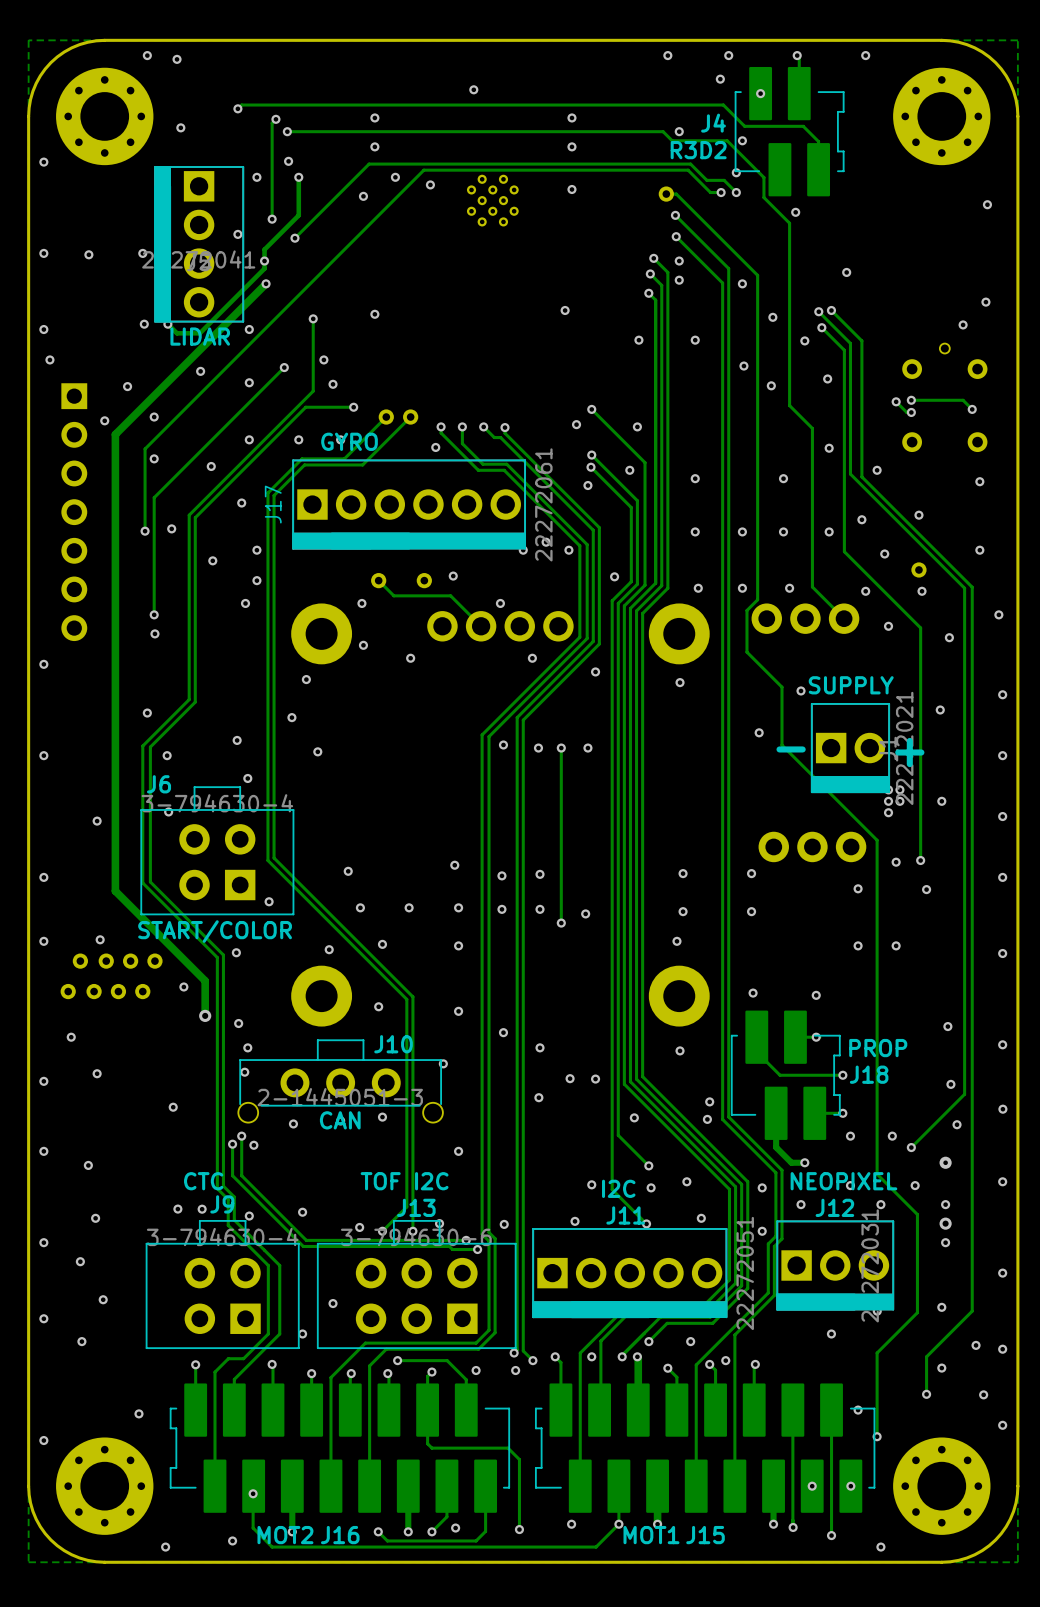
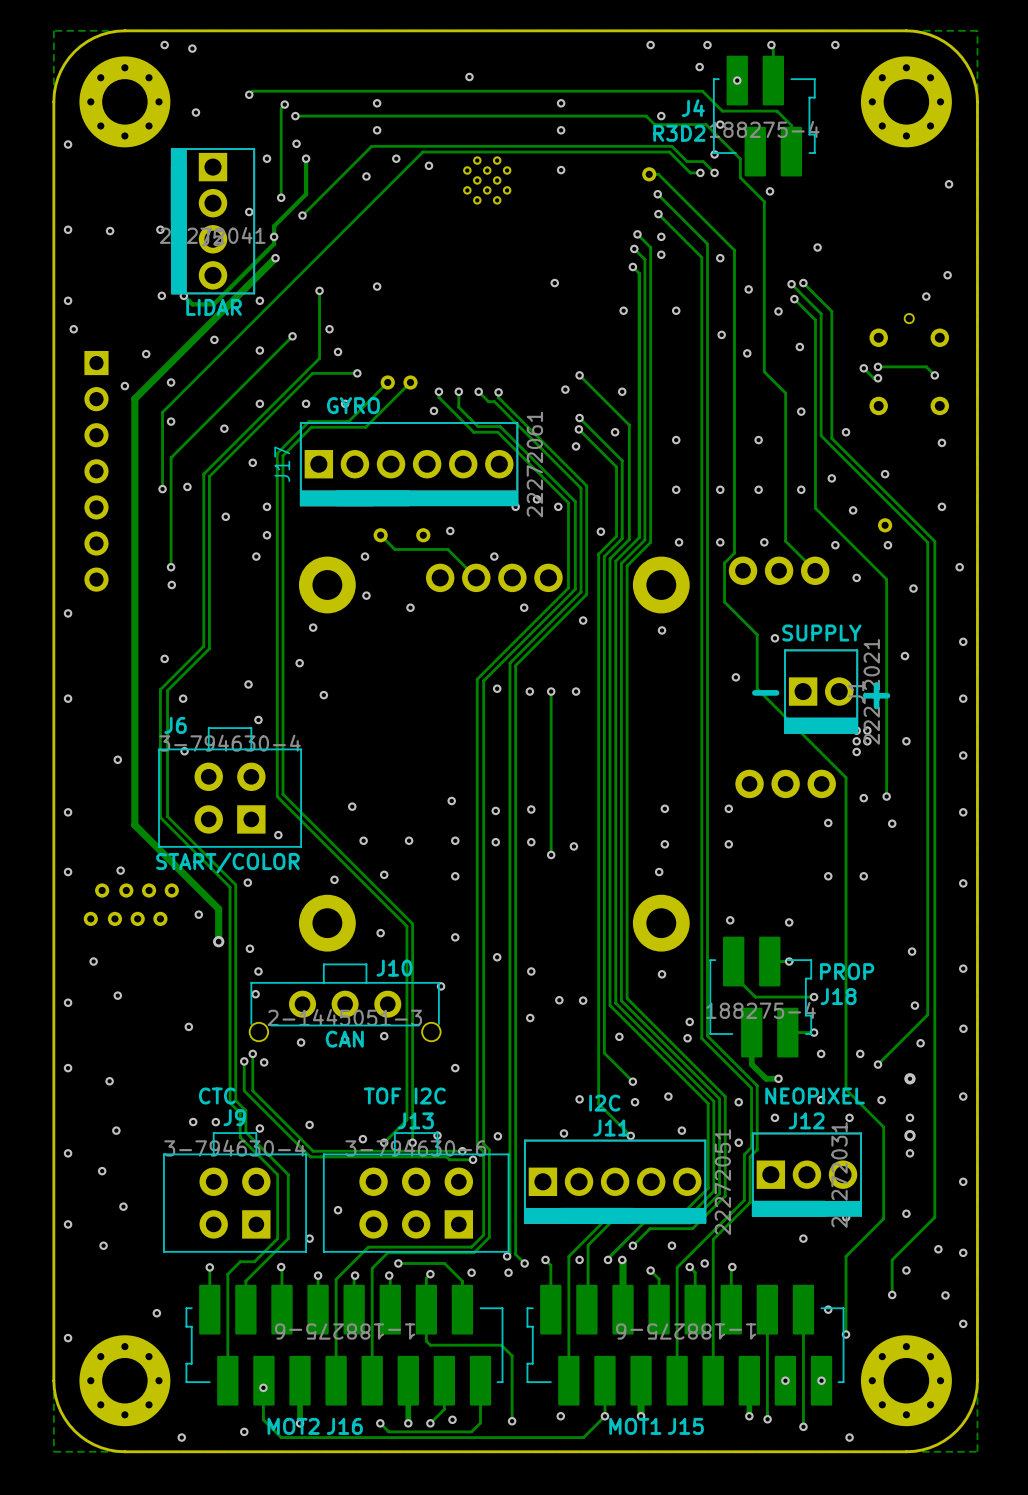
J4 value: none -> 188275-4 (764, 129)
J18 value: none -> 188275-4 (761, 1010)
J16 value: none -> 1-188275-6 (345, 1331)
J15 value: none -> 1-188275-6 (686, 1331)

